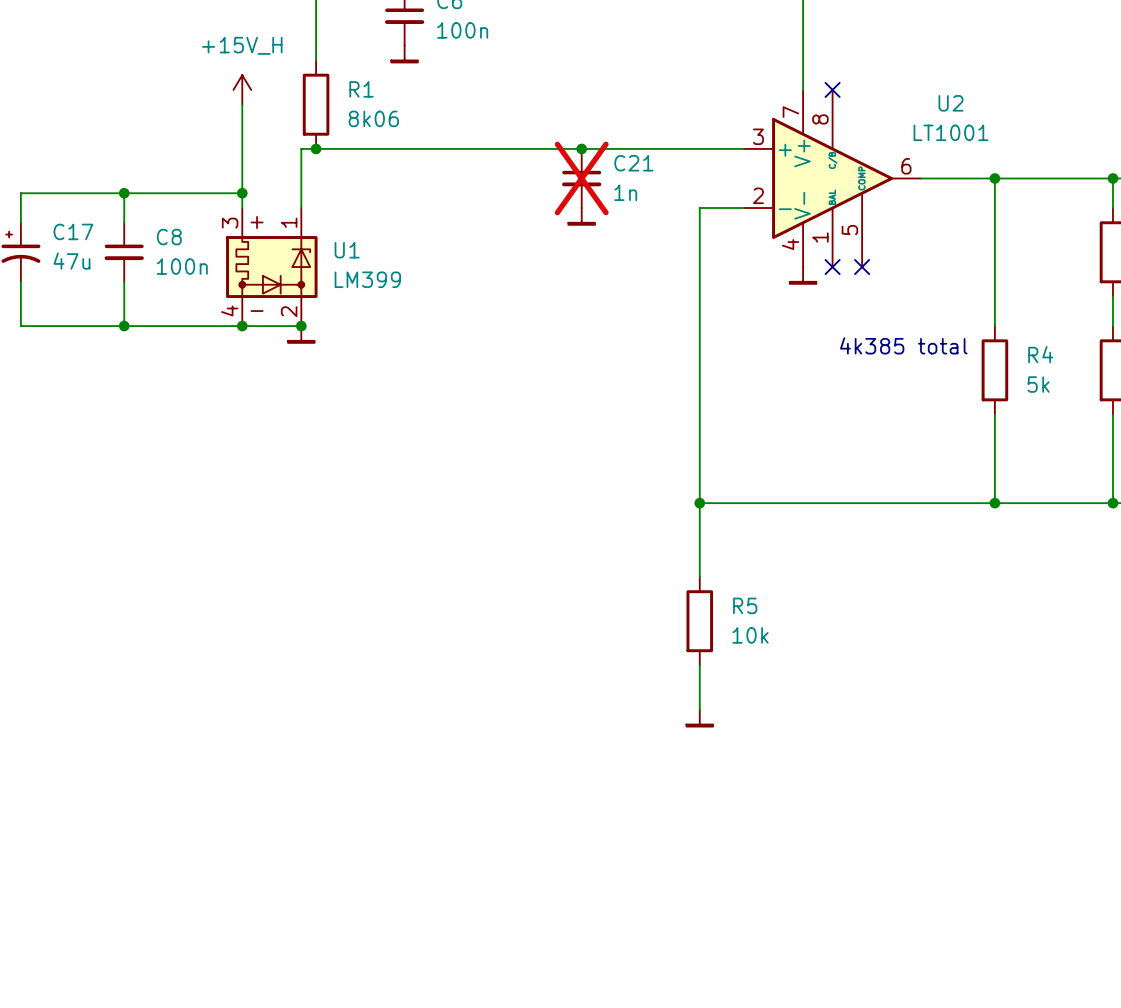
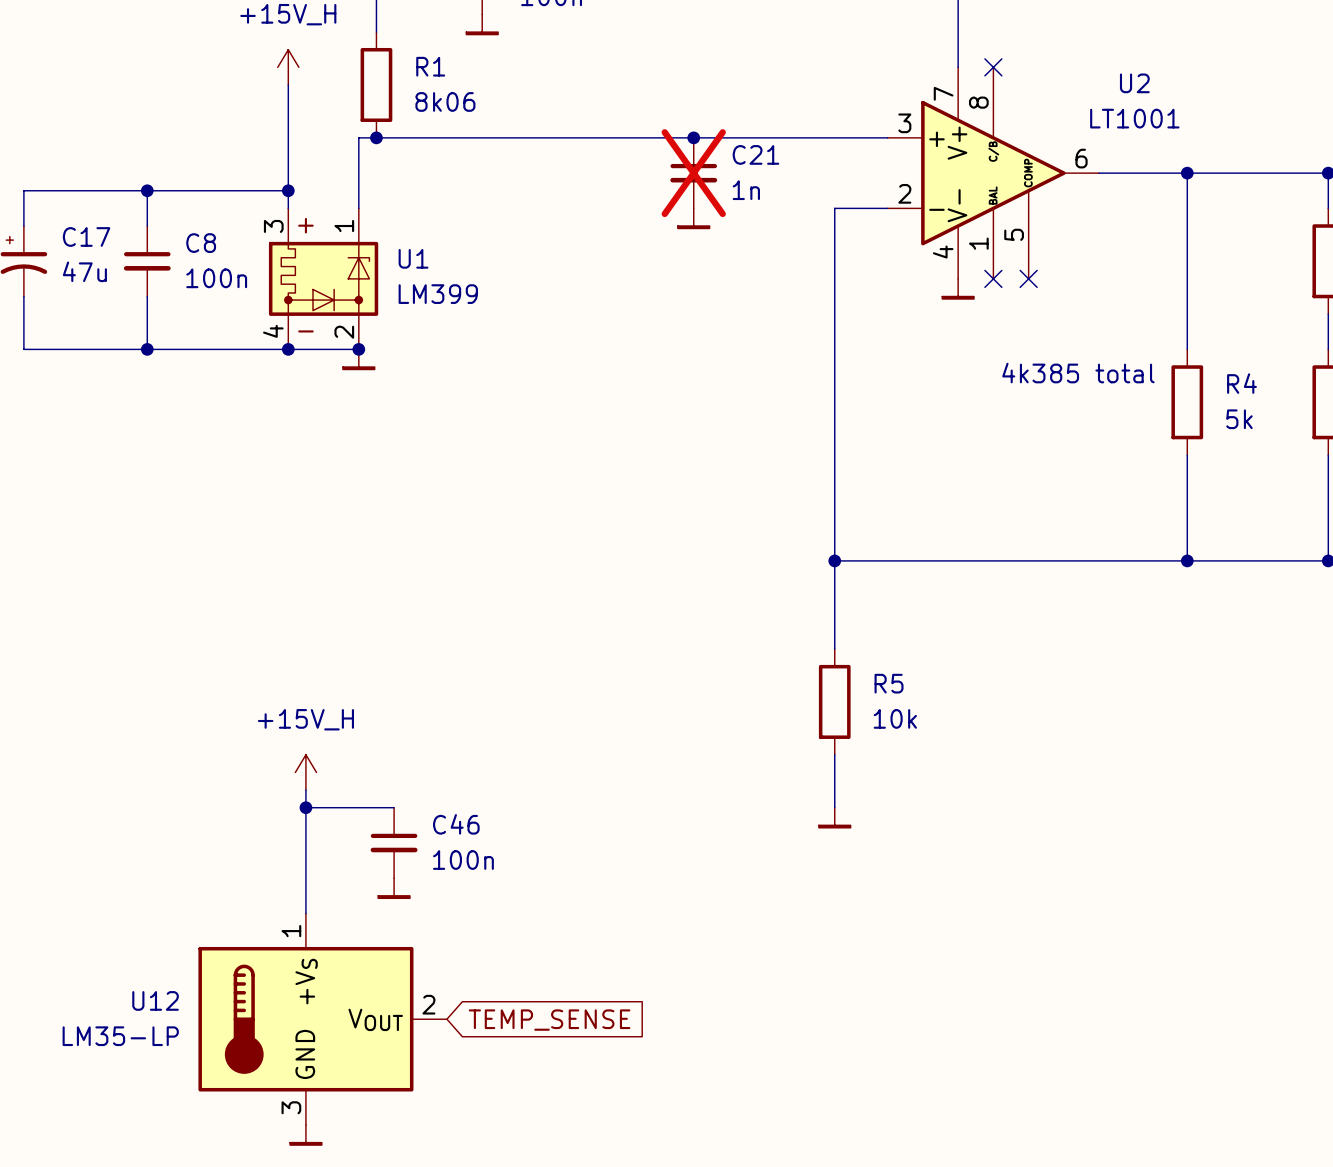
power symbol: none -> +15V_H (305, 772)
wire: none -> (305, 790) (305, 913)
wire: none -> (305, 807) (394, 807)
junction: none -> (305, 807)
C46: none -> 100n (394, 842)
power symbol: none -> (394, 888)
U12: none -> LM35-LP (322, 1019)
global label: none -> TEMP_SENSE (549, 1020)
power symbol: none -> (305, 1135)

